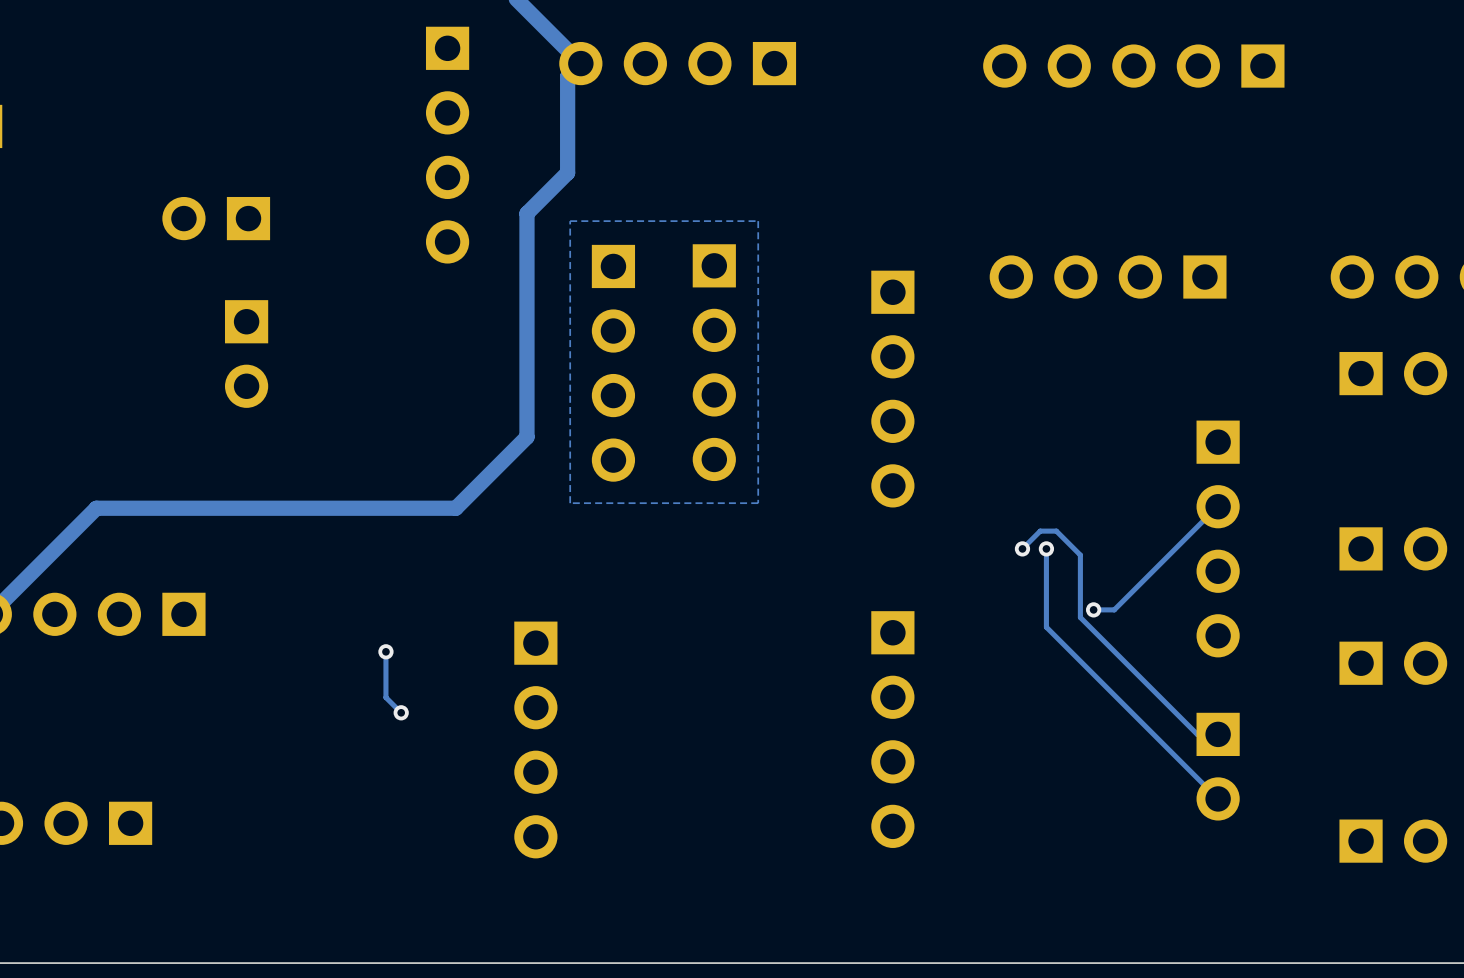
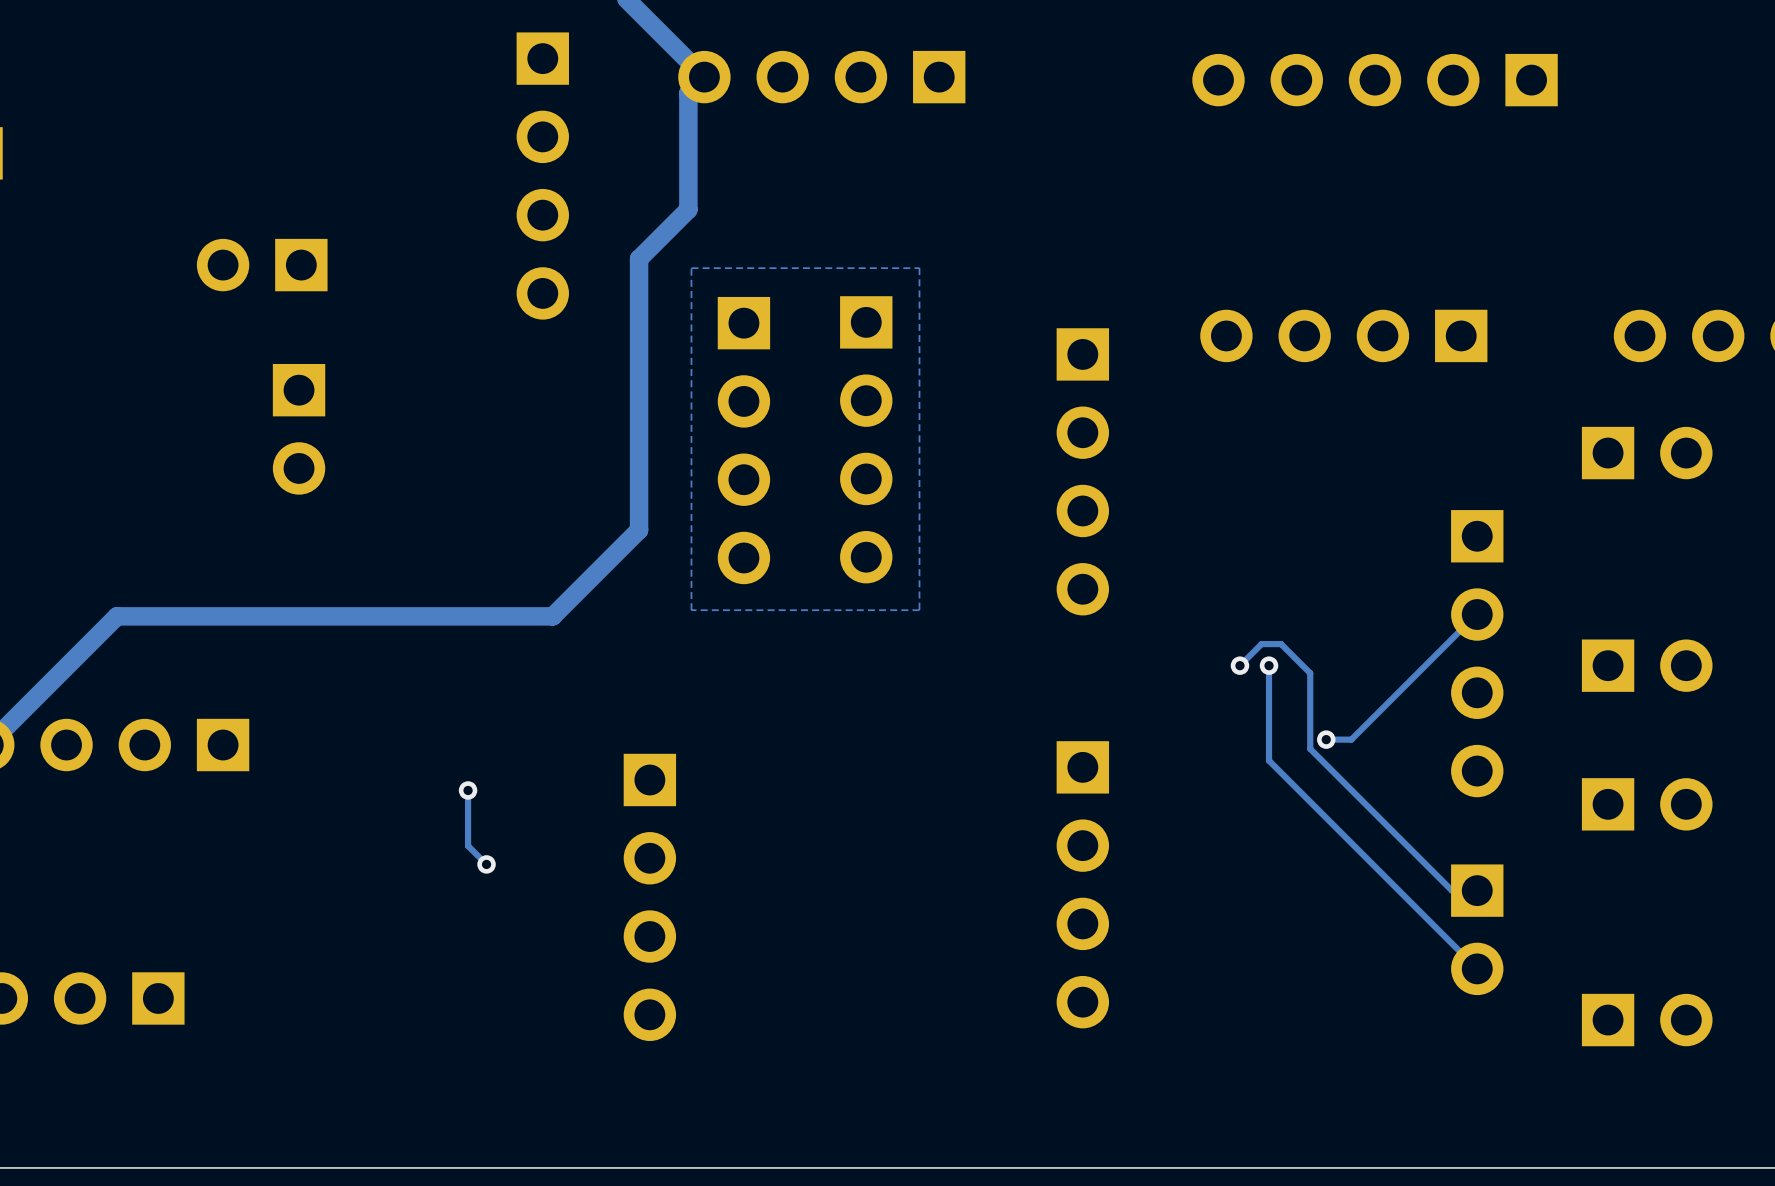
part position: (1393, 373) -> (1647, 453)
part position: (1393, 548) -> (1647, 665)
part position: (1393, 663) -> (1647, 804)
part position: (1393, 841) -> (1647, 1020)

